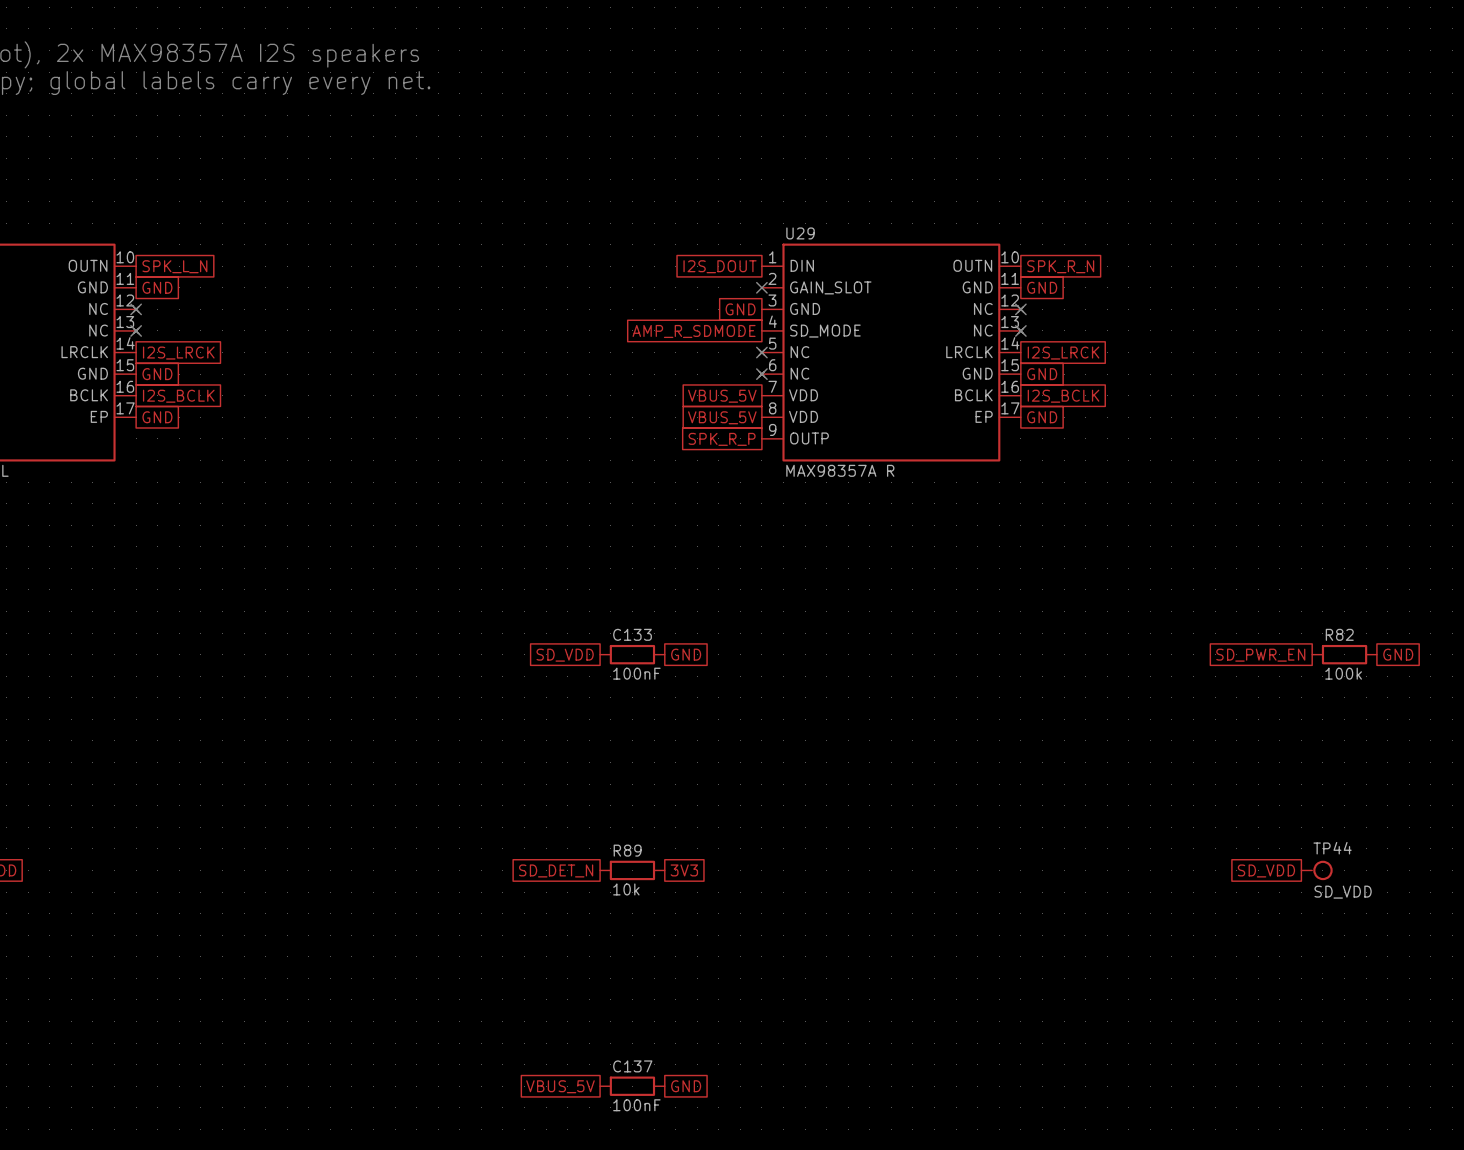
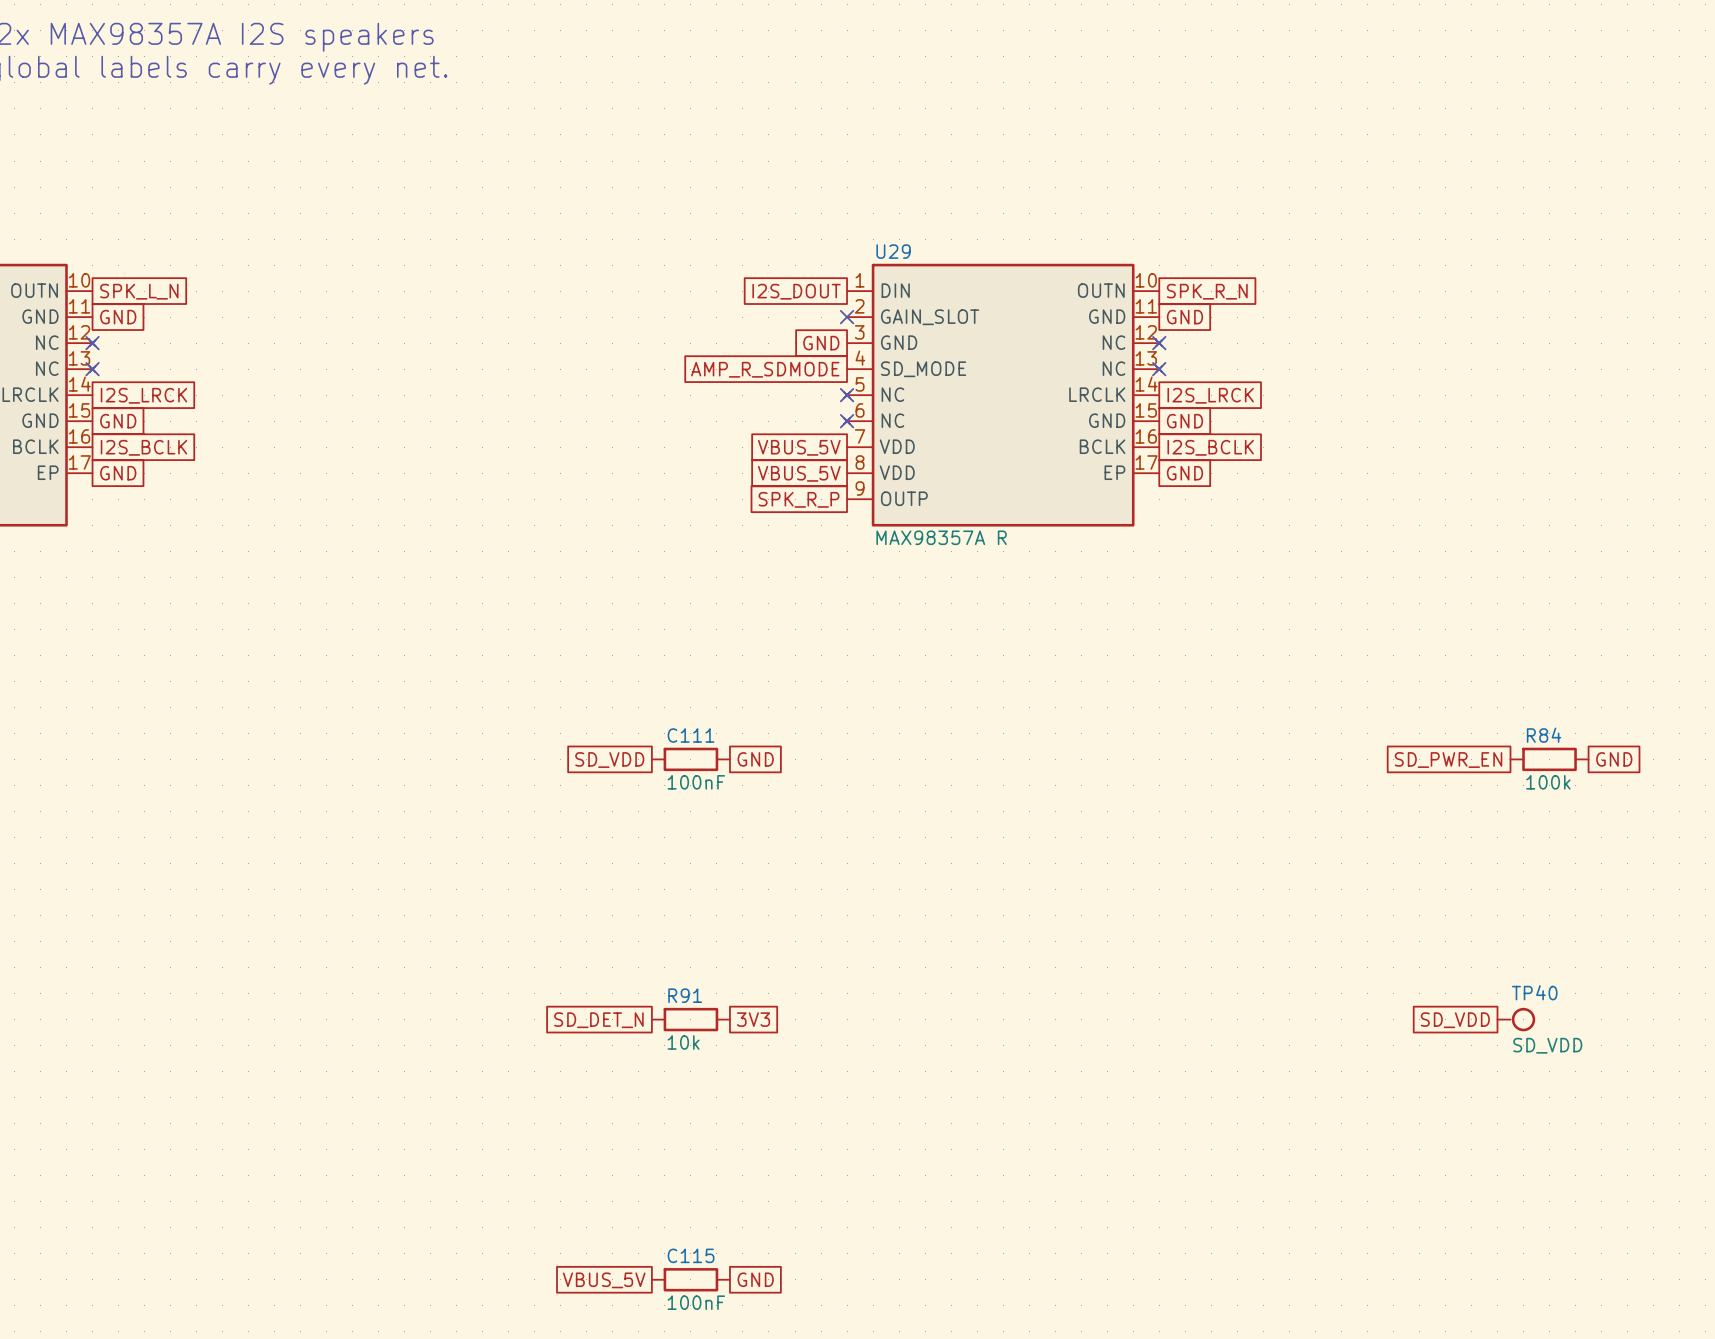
C133 name: C133 (632, 634) -> C111 (691, 735)
R82 name: R82 (1339, 634) -> R84 (1544, 735)
TP44 name: TP44 (1332, 848) -> TP40 (1534, 992)
R89 name: R89 (627, 850) -> R91 (685, 995)
C137 name: C137 (632, 1066) -> C115 (691, 1255)

